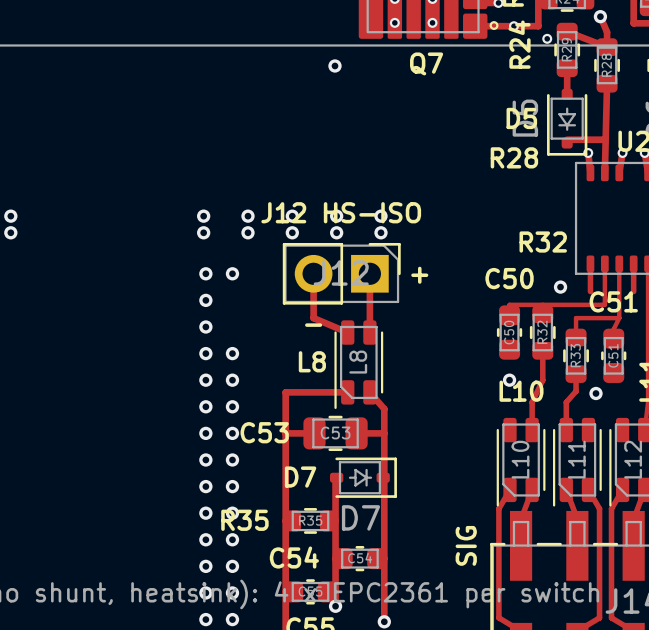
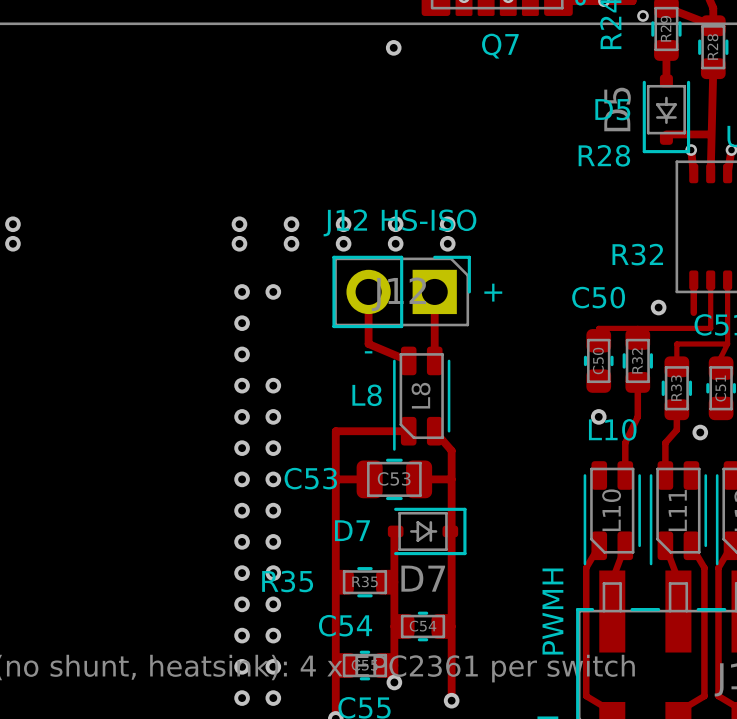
text: SIG (466, 545) -> PWMH (552, 611)

